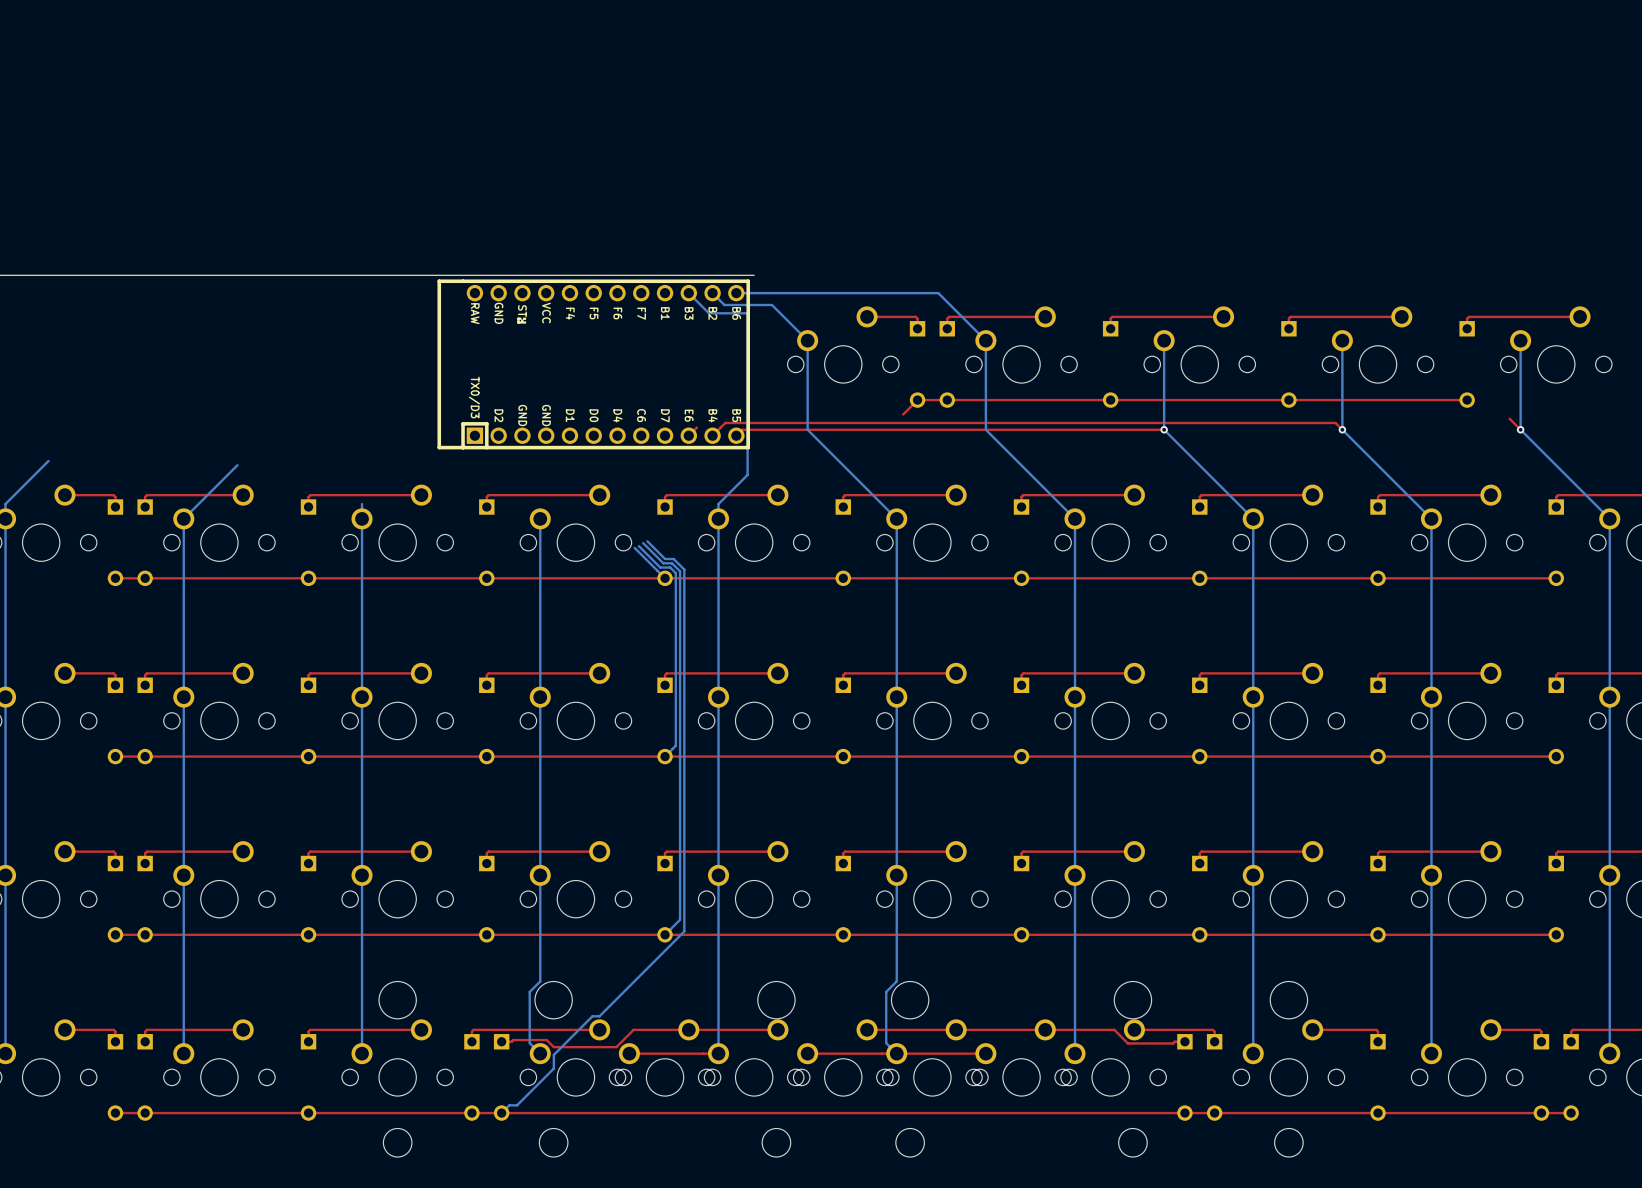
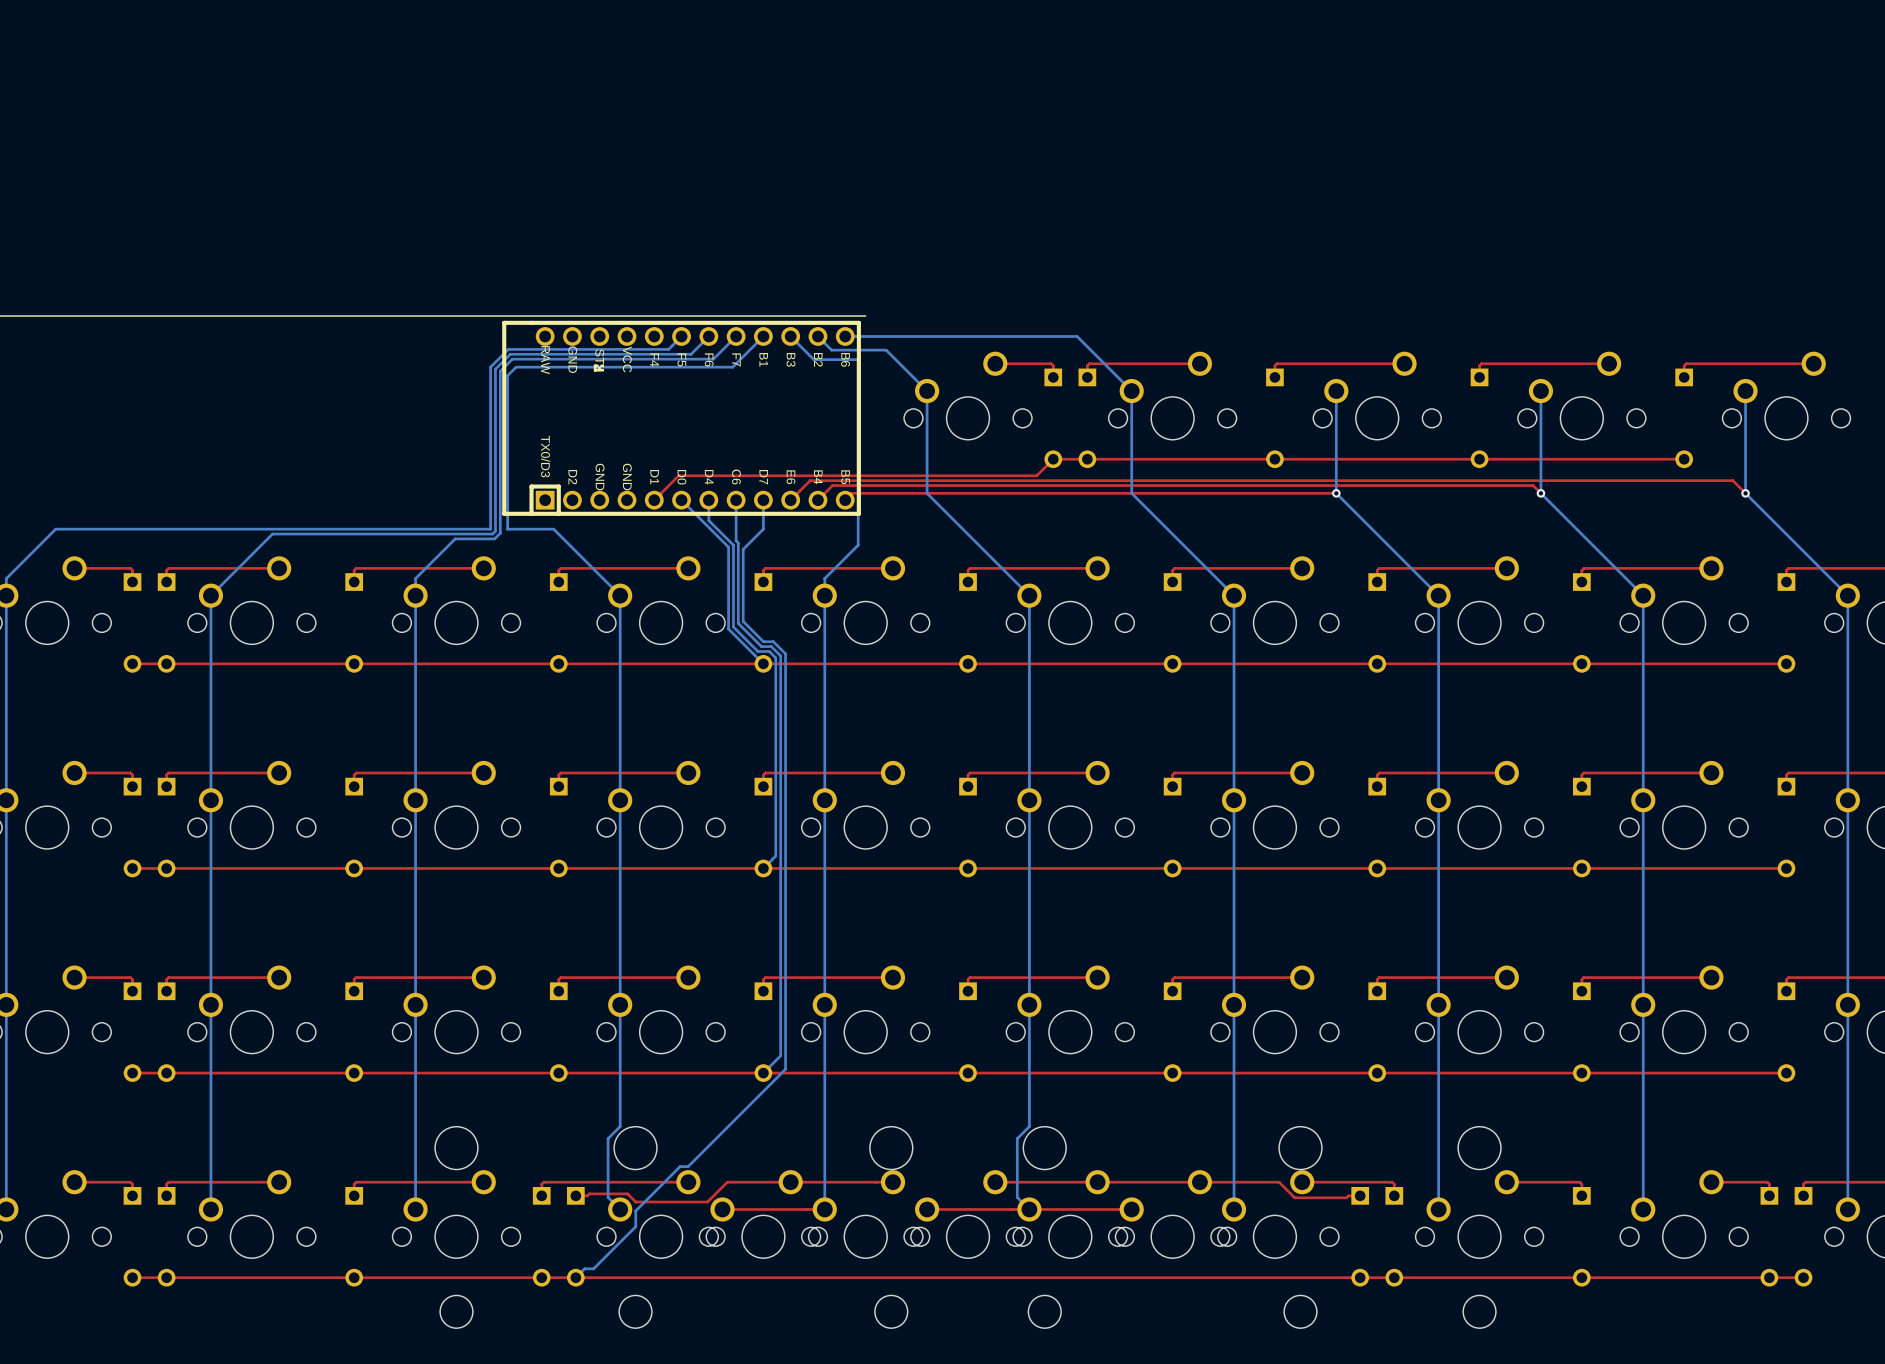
bottom track: none -> (681, 336) (668, 349) (508, 349) (490, 367) (490, 529) (55, 529)
bottom track: none -> (708, 336) (691, 354) (510, 354) (495, 369) (495, 531) (492, 534) (272, 534)
bottom track: none -> (736, 336) (713, 359) (512, 359) (500, 371) (500, 533) (494, 538) (455, 538) (415, 578)
bottom track: none -> (763, 336) (732, 367) (516, 367) (507, 375) (507, 529) (553, 529) (620, 595)
top track: none -> (1036, 475) (678, 475) (654, 500)
top track: none -> (1732, 480) (810, 480) (800, 490)
bottom track: none -> (681, 500) (728, 547) (728, 629)
bottom track: none -> (708, 500) (708, 520) (733, 545) (733, 627)
bottom track: none -> (736, 500) (738, 623)
bottom track: none -> (763, 500) (763, 529) (743, 549) (743, 621)

